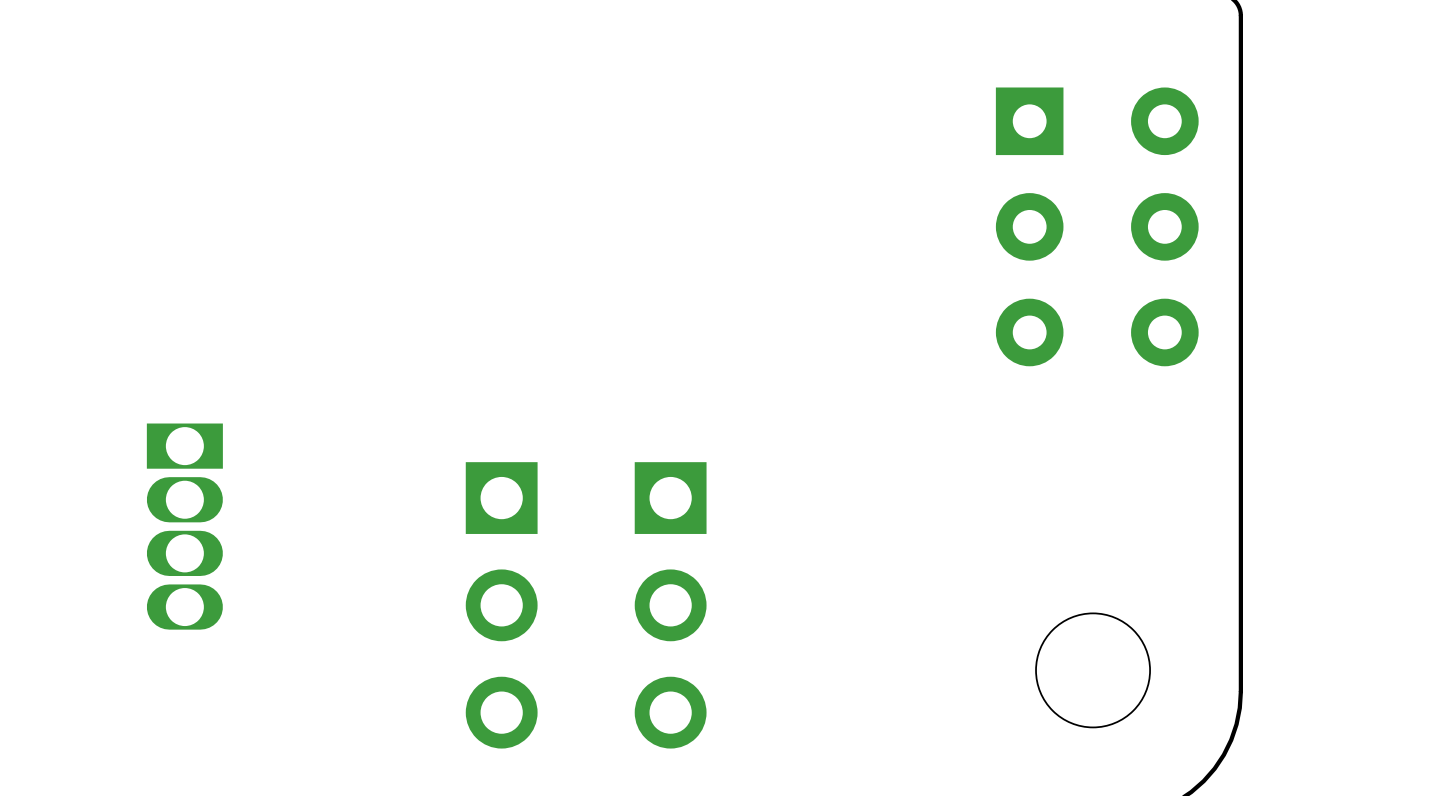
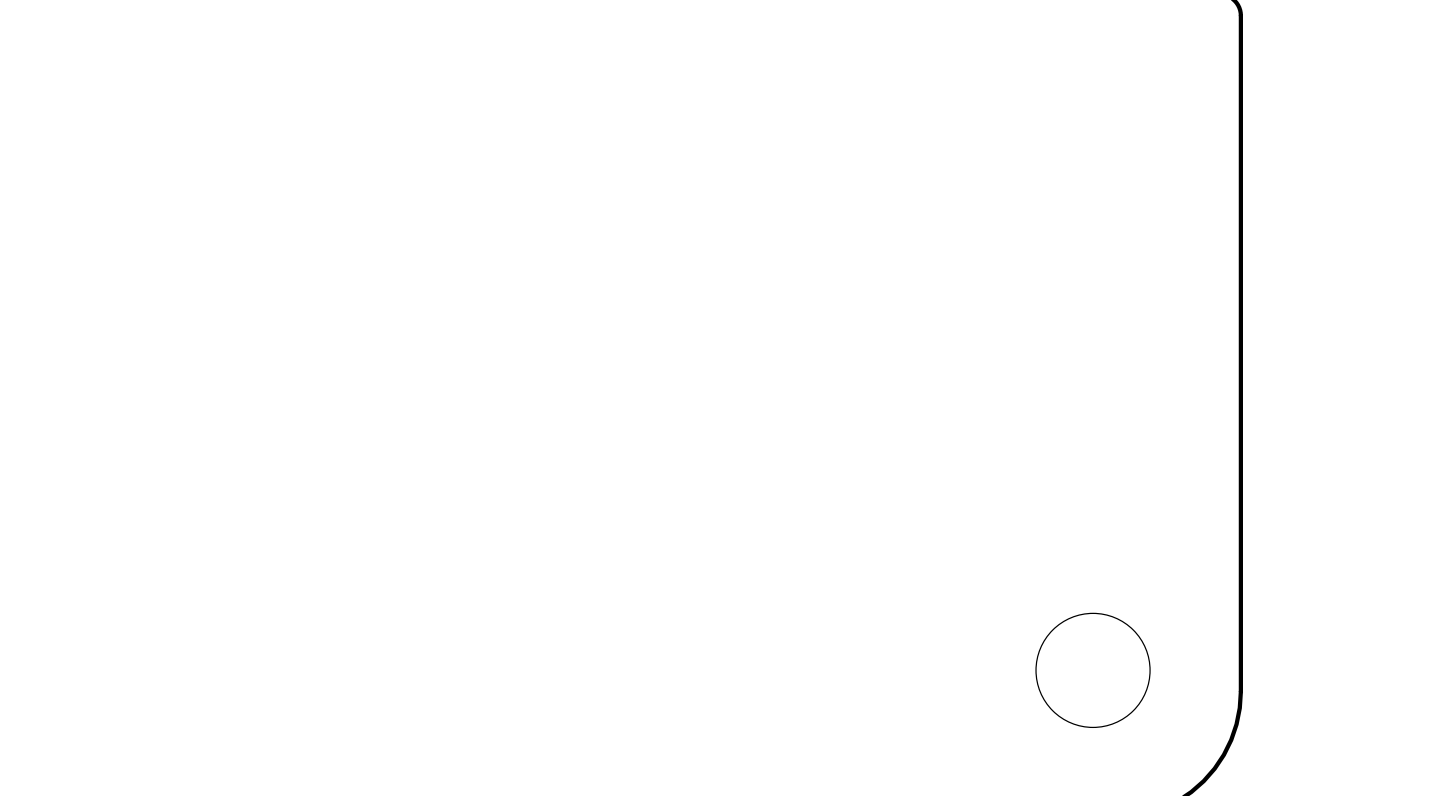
part: (1097, 226) -> none
part: (184, 526) -> none
part: (501, 605) -> none
part: (670, 605) -> none

